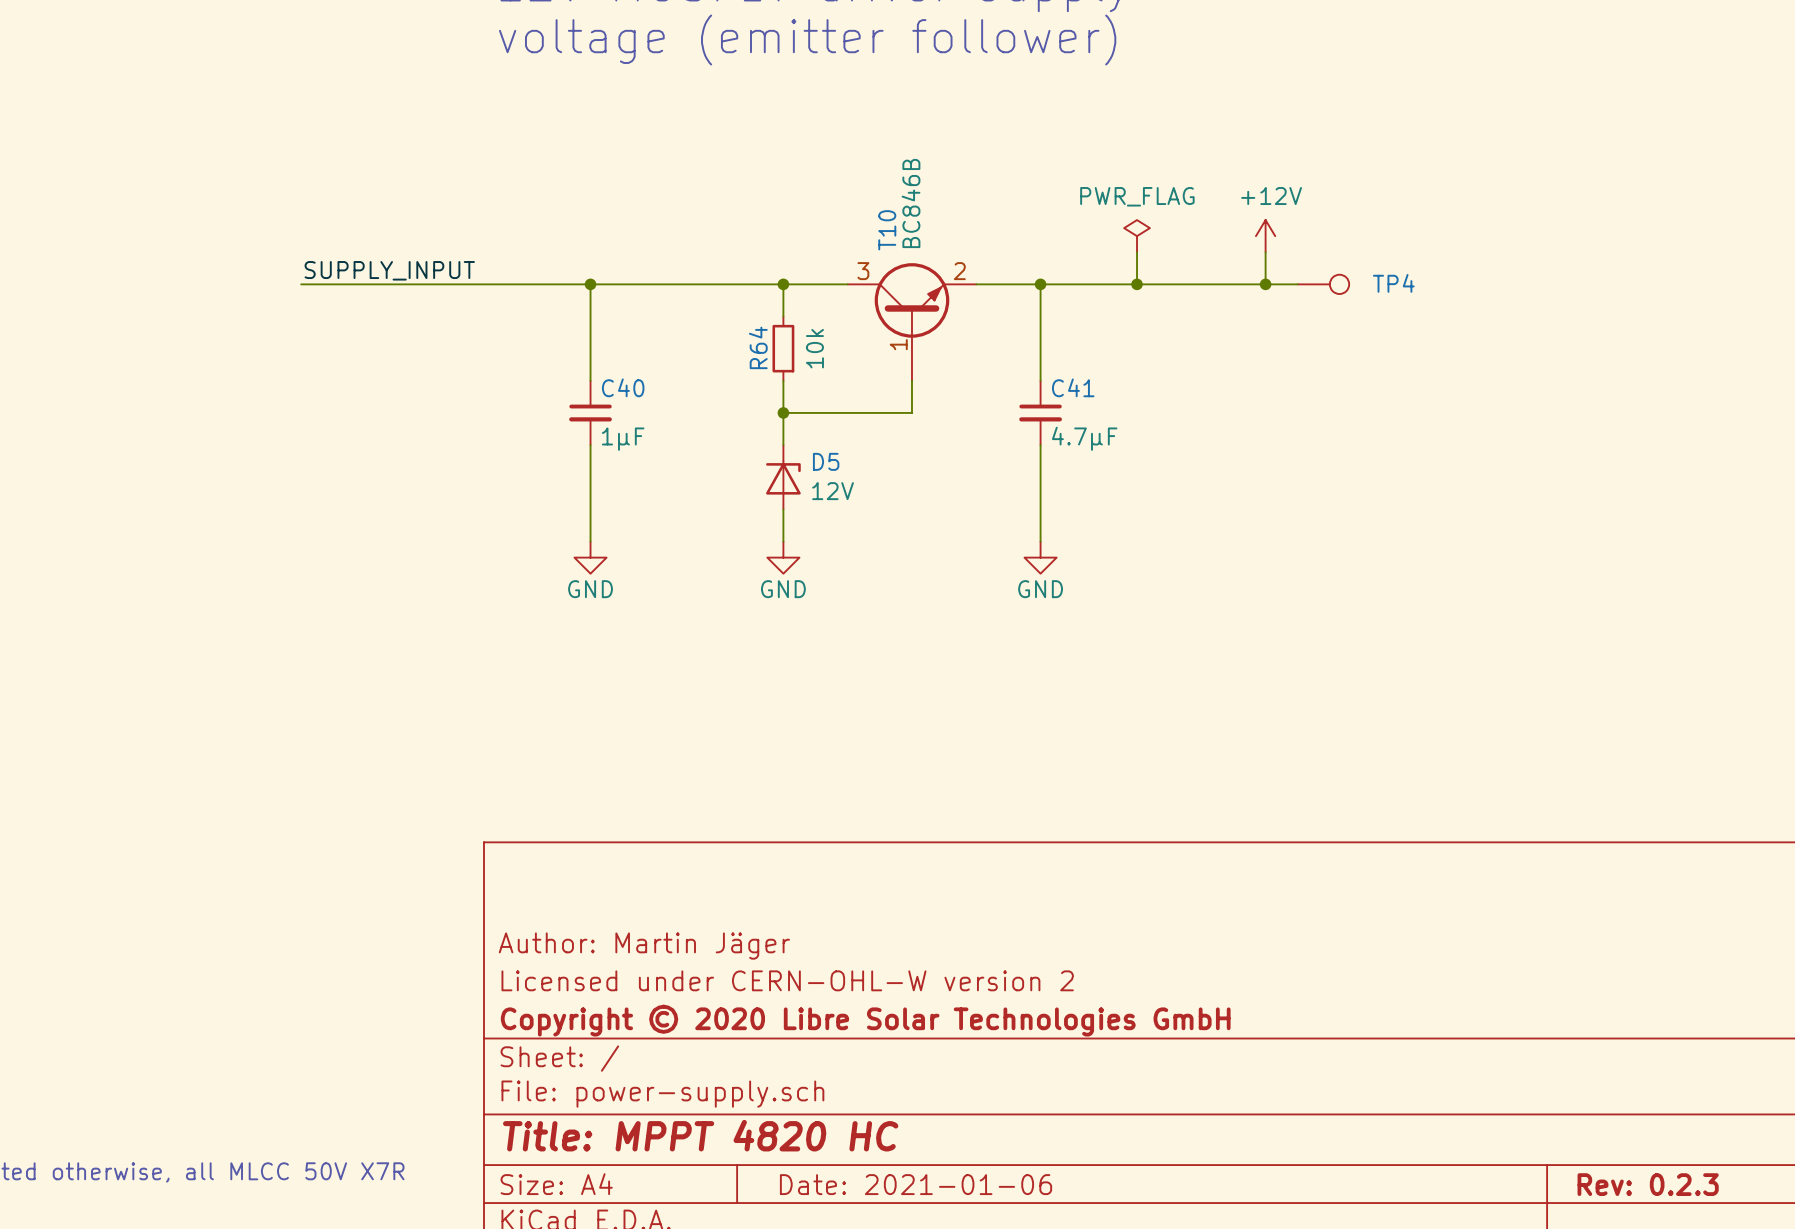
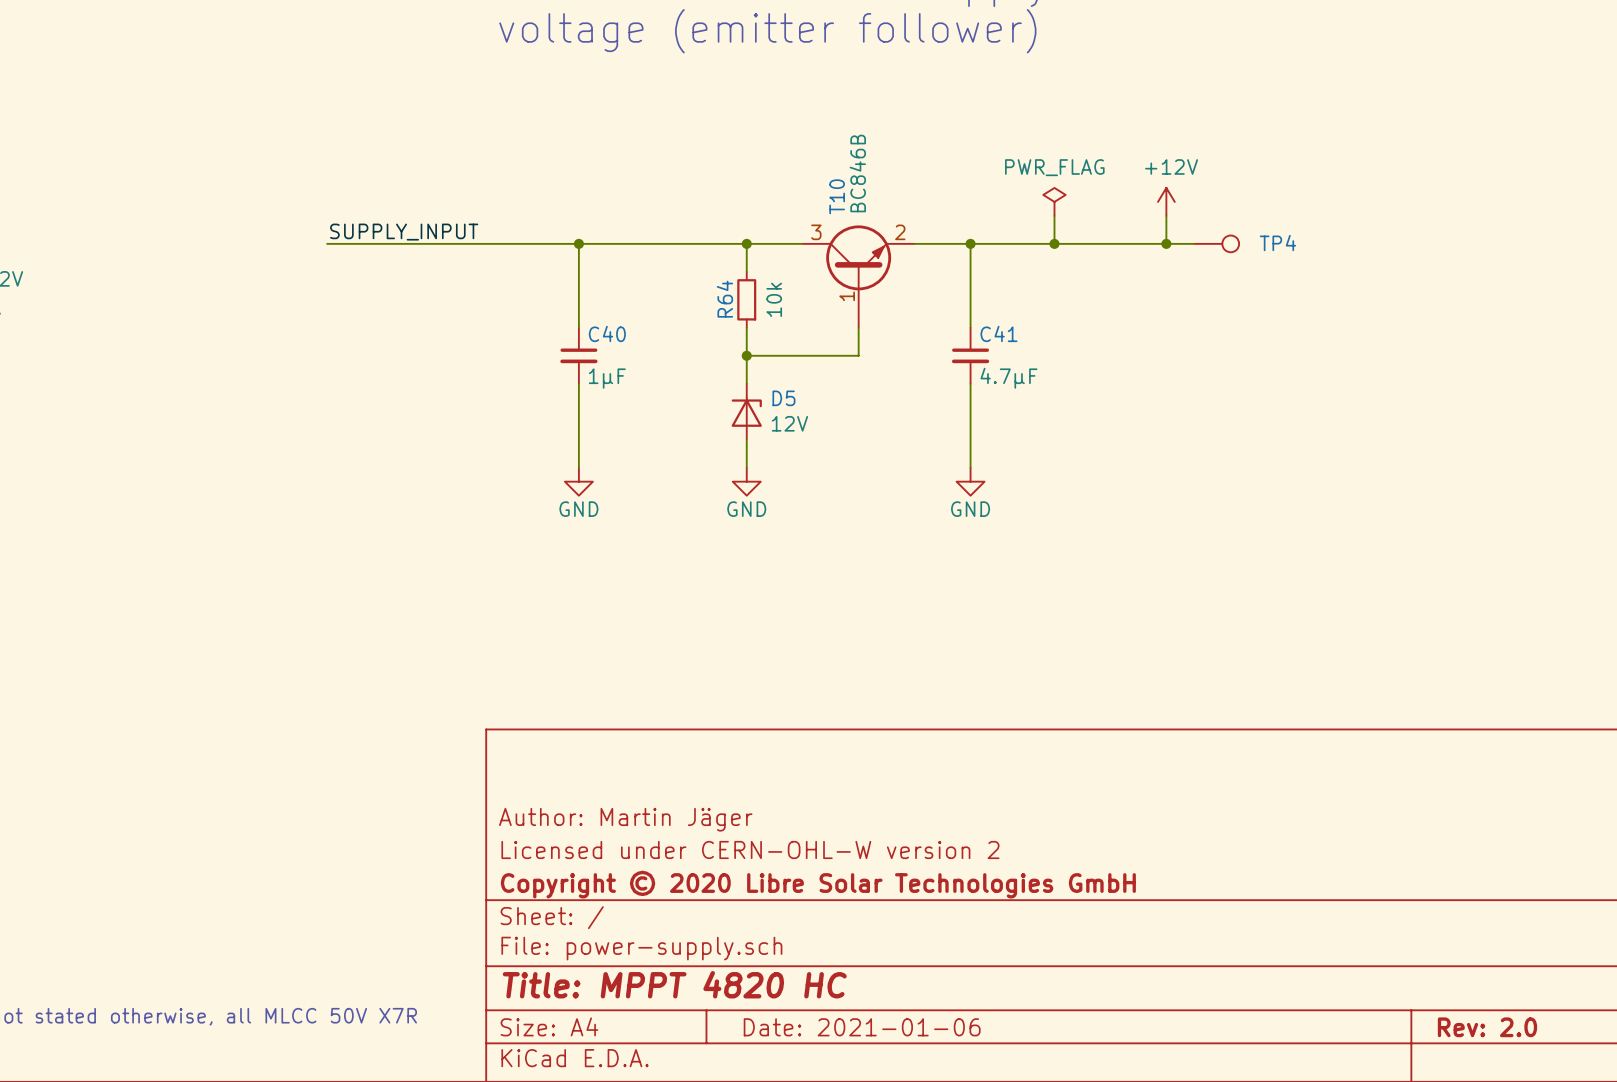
title block: Rev: 0.2.3 (1648, 1184) -> Rev: 2.0 (1487, 1027)

